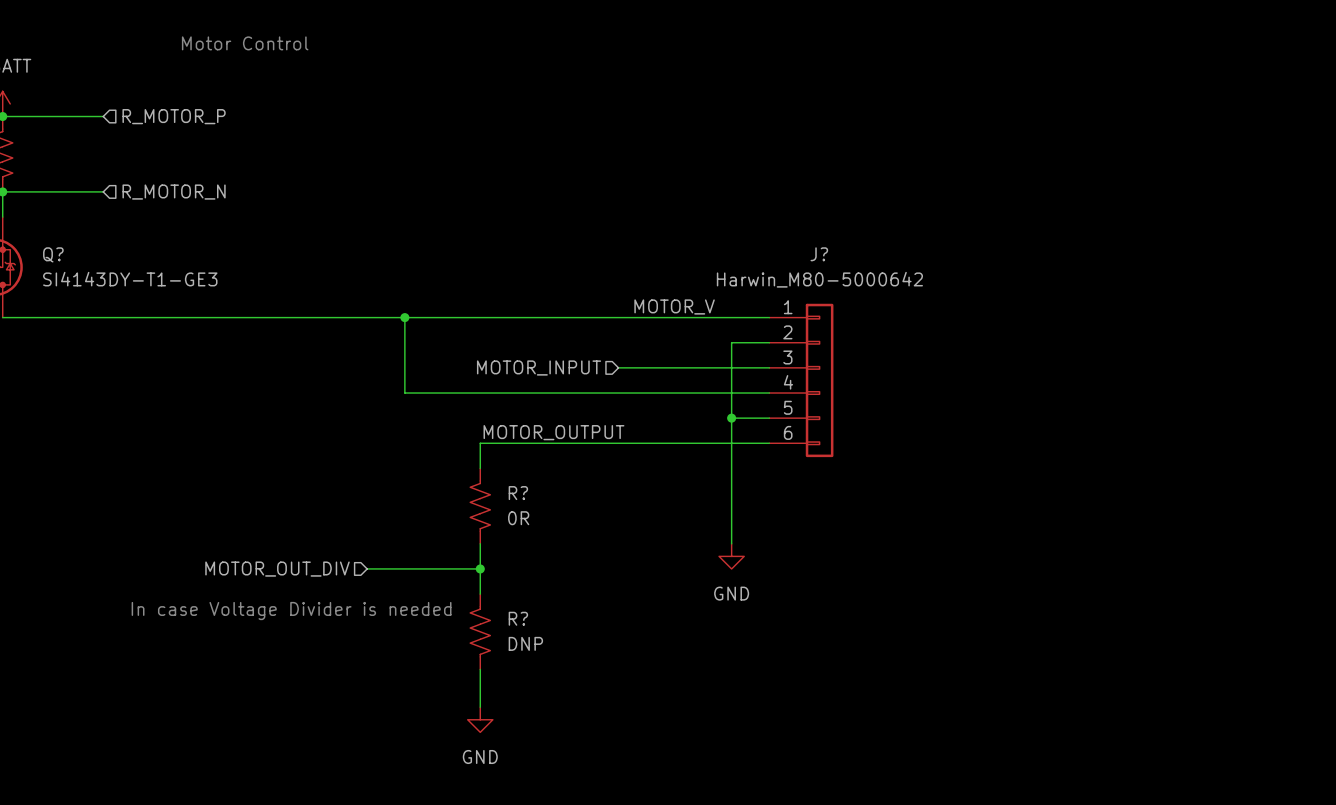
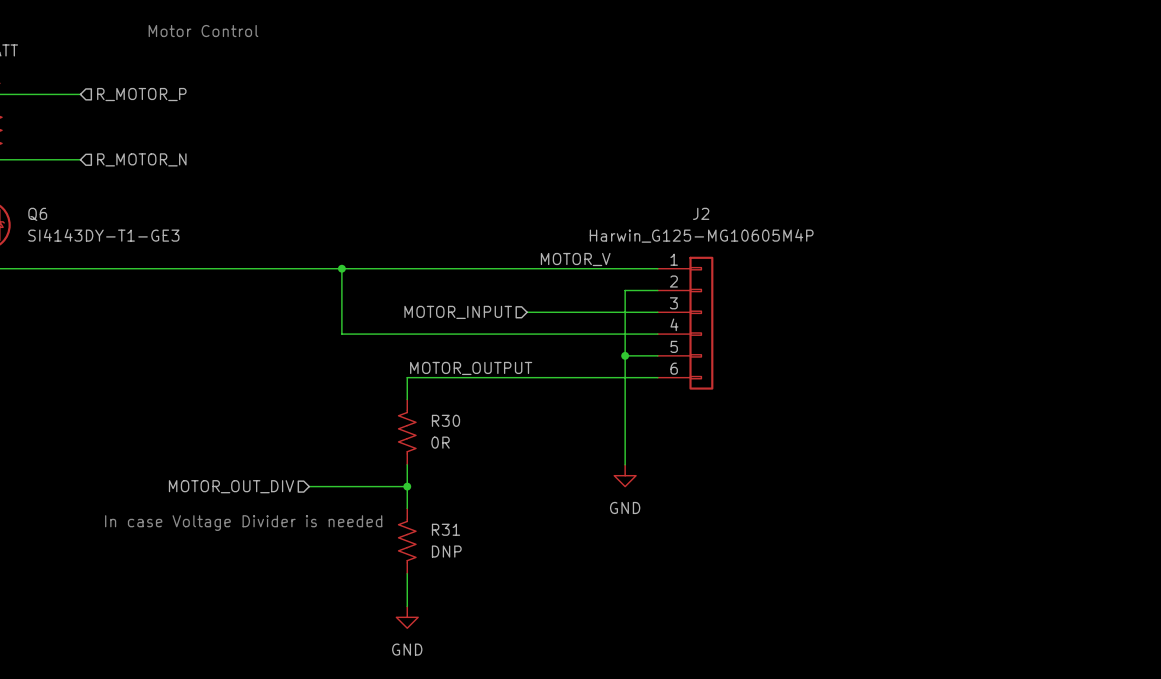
Q? name: Q? (53, 254) -> Q6 (37, 214)
J? name: J? (819, 254) -> J2 (701, 213)
J? value: Harwin_M80-5000642 (819, 279) -> Harwin_G125-MG10605M4P (701, 235)
R? name: R? (518, 493) -> R30 (446, 420)
R? name: R? (518, 618) -> R31 (446, 529)

